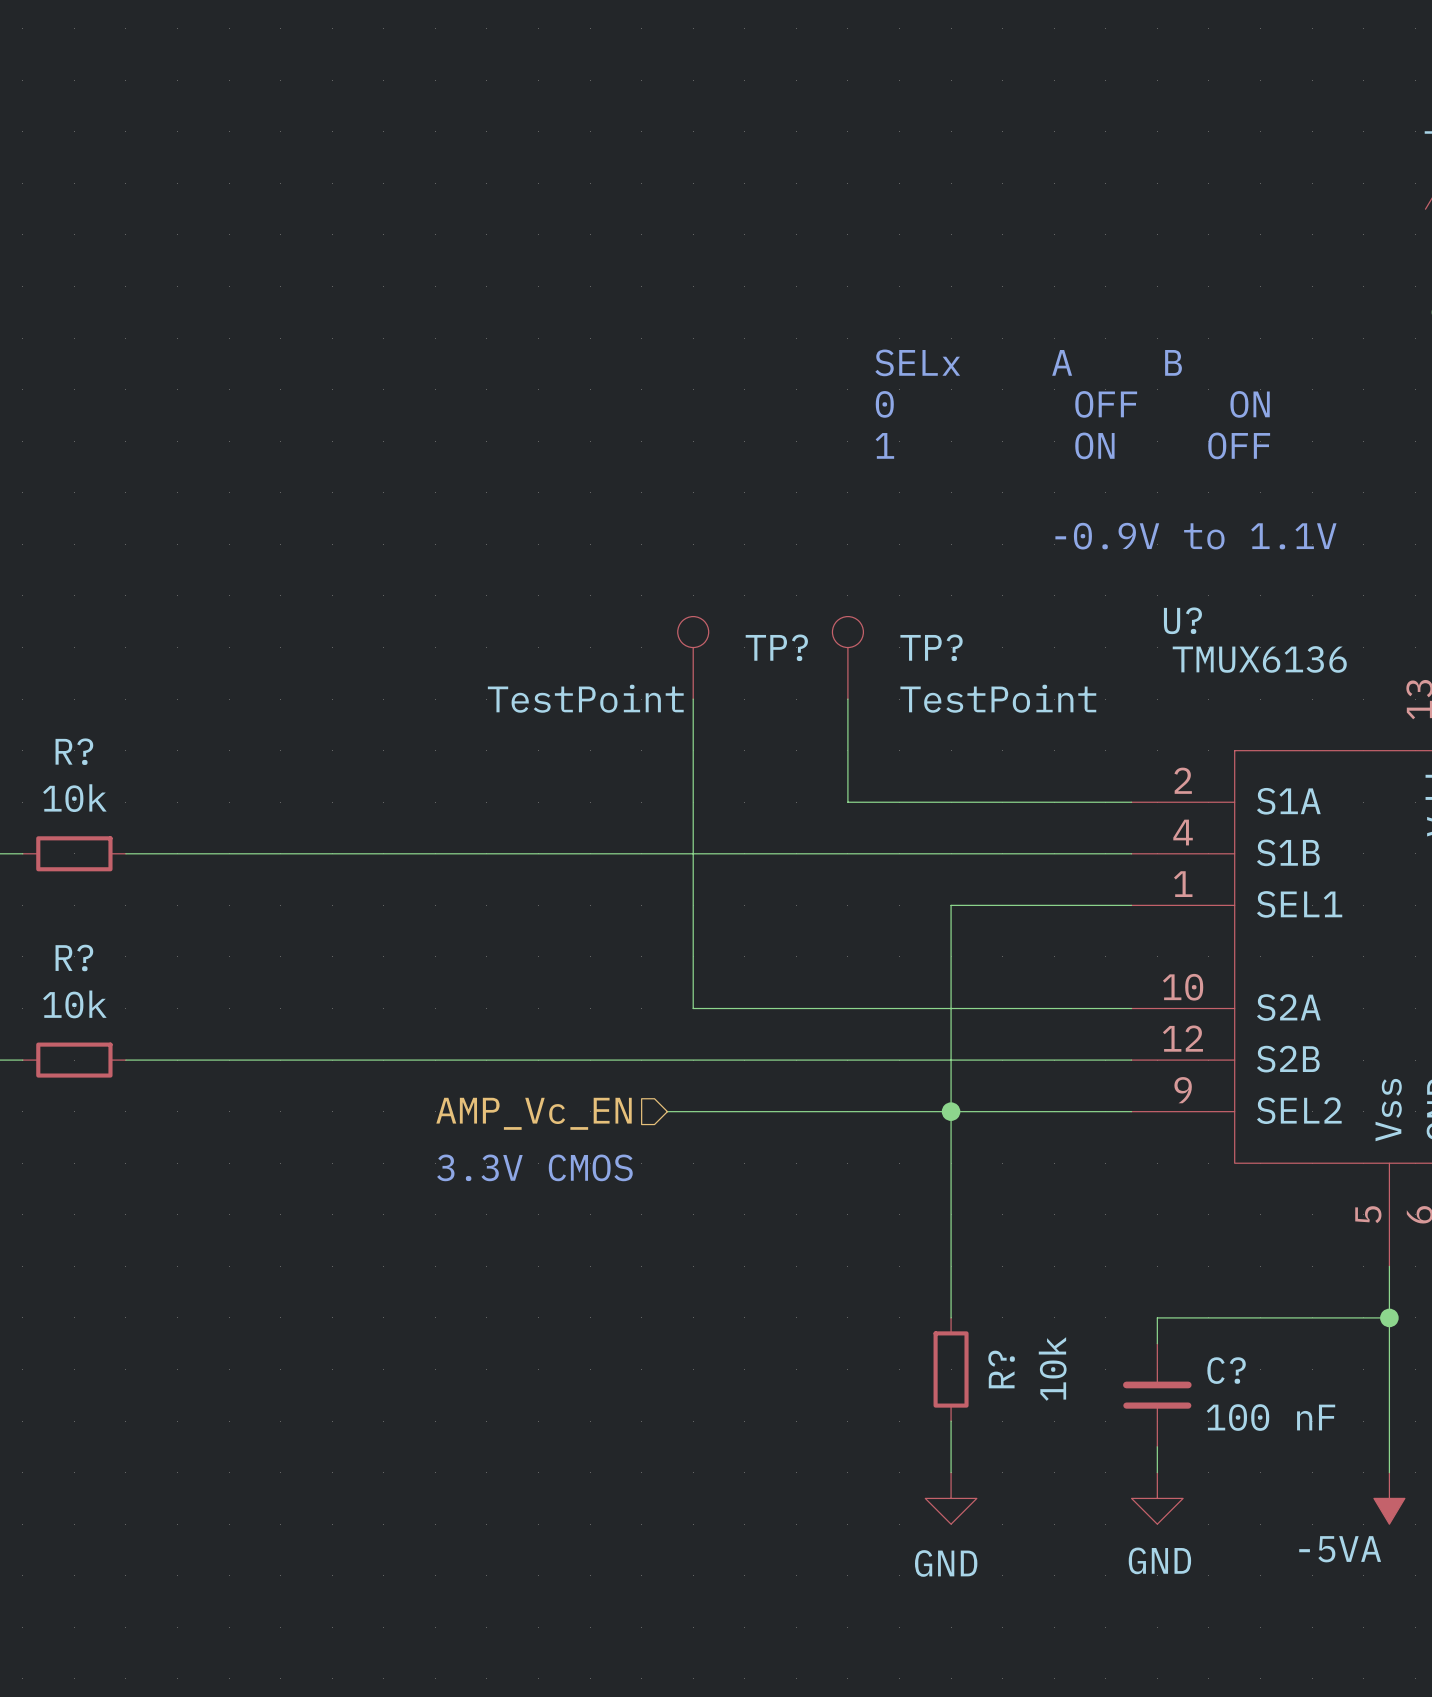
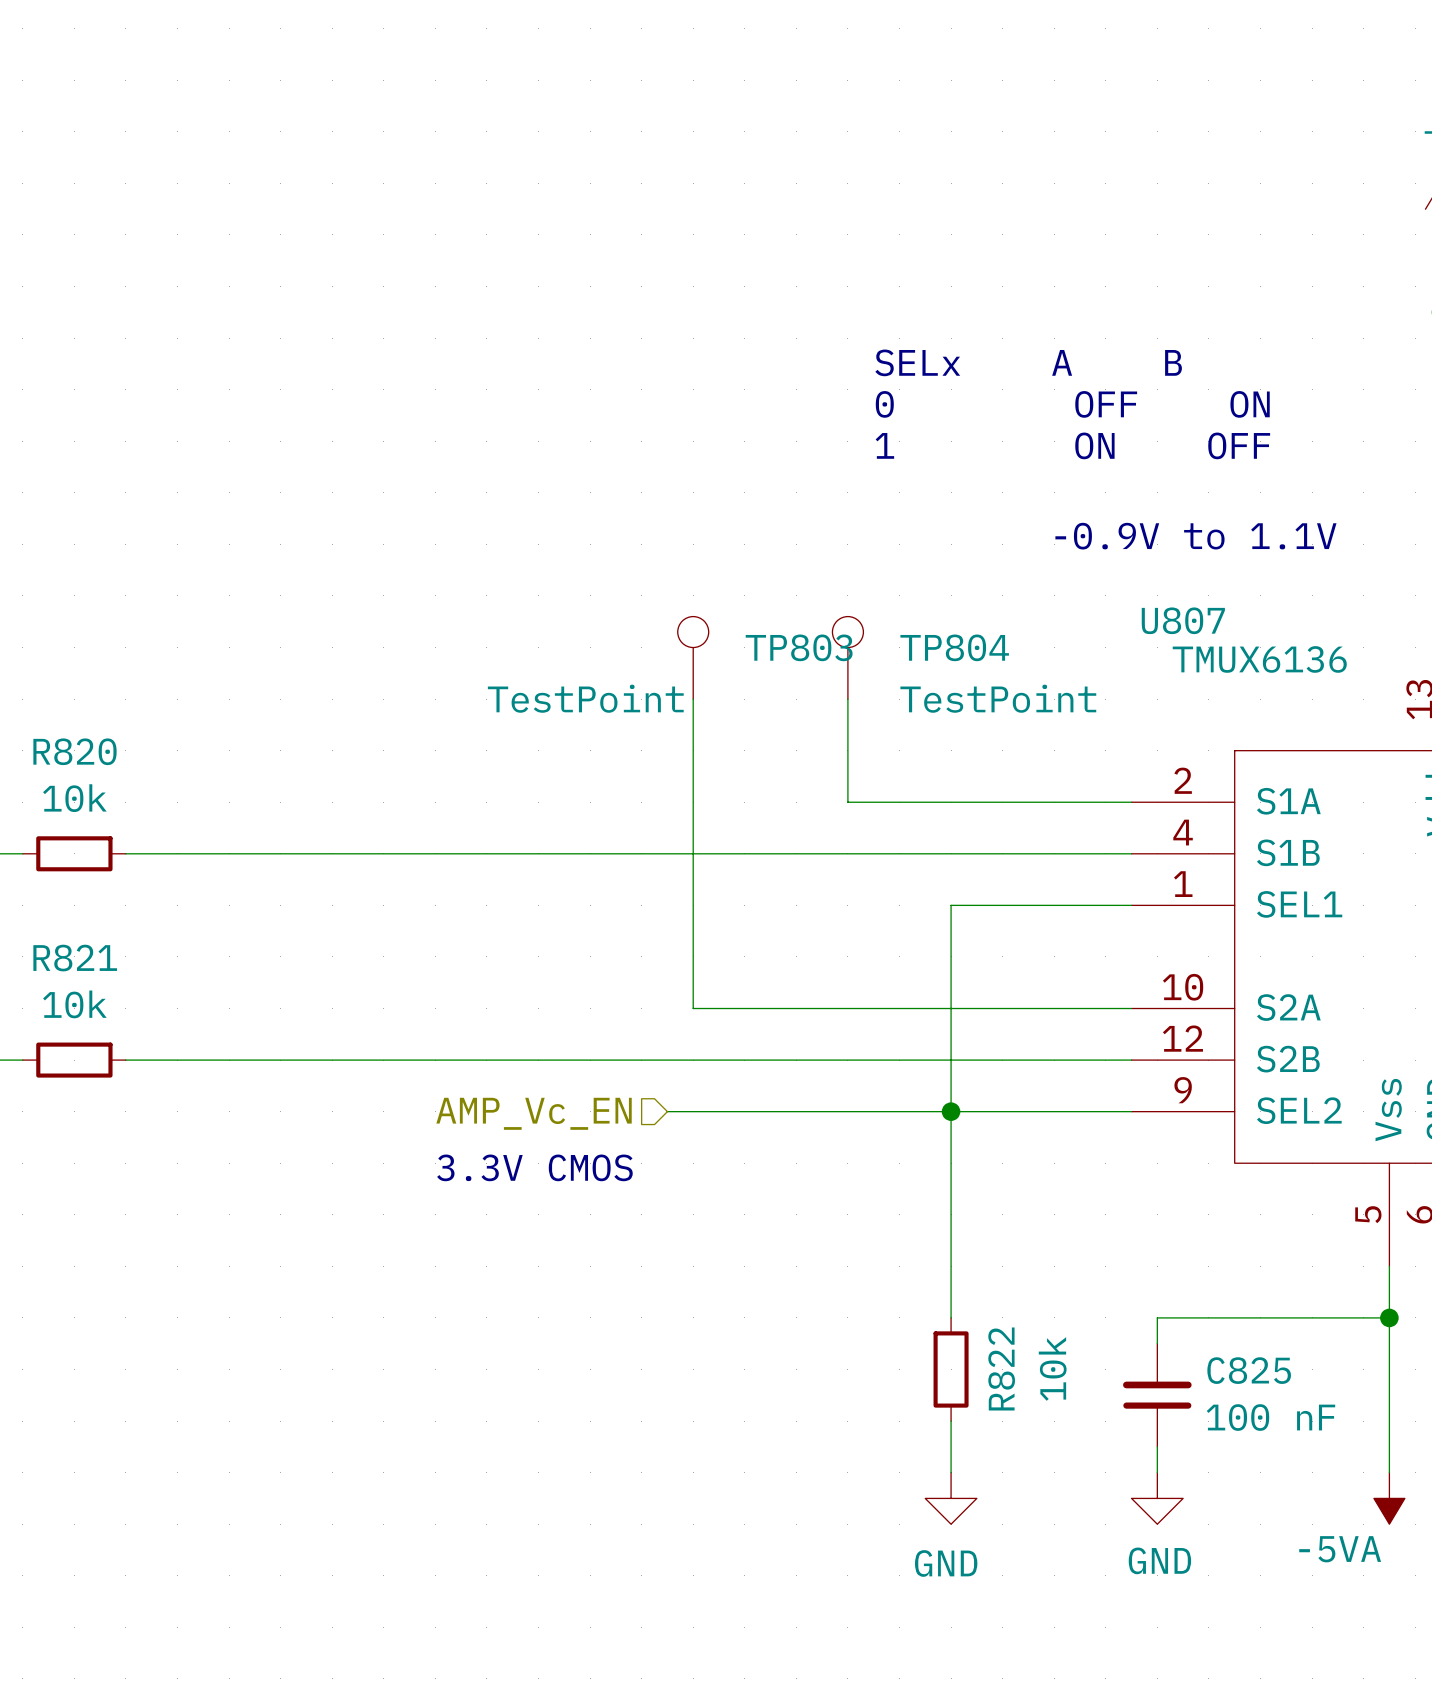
U? name: U? (1182, 620) -> U807 (1183, 620)
TP? name: TP? (776, 647) -> TP803 (799, 647)
TP? name: TP? (931, 647) -> TP804 (954, 647)
R? name: R? (74, 751) -> R820 (75, 751)
R? name: R? (74, 957) -> R821 (75, 958)
R? name: R? (1001, 1369) -> R822 (1001, 1369)
C? name: C? (1226, 1370) -> C825 (1249, 1370)

